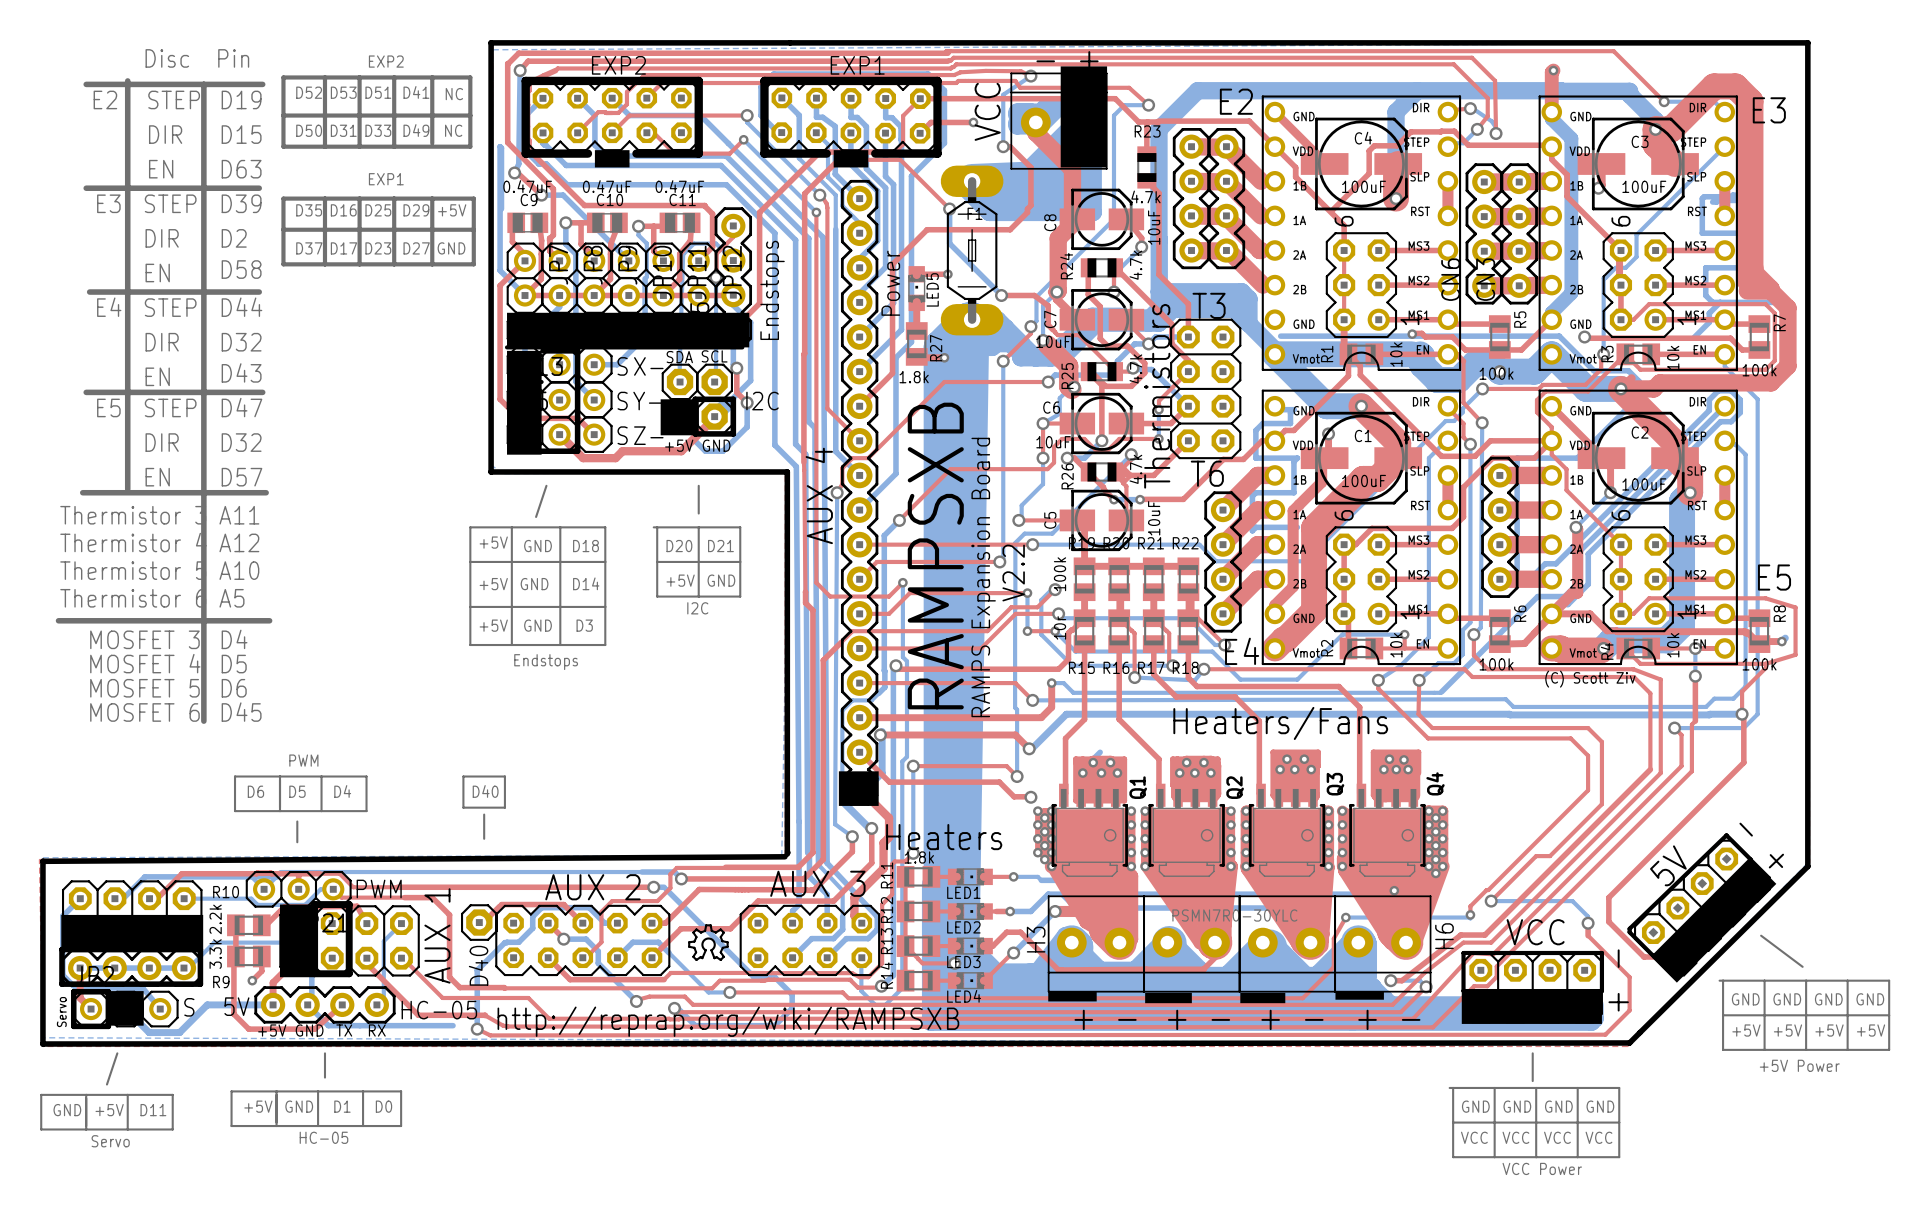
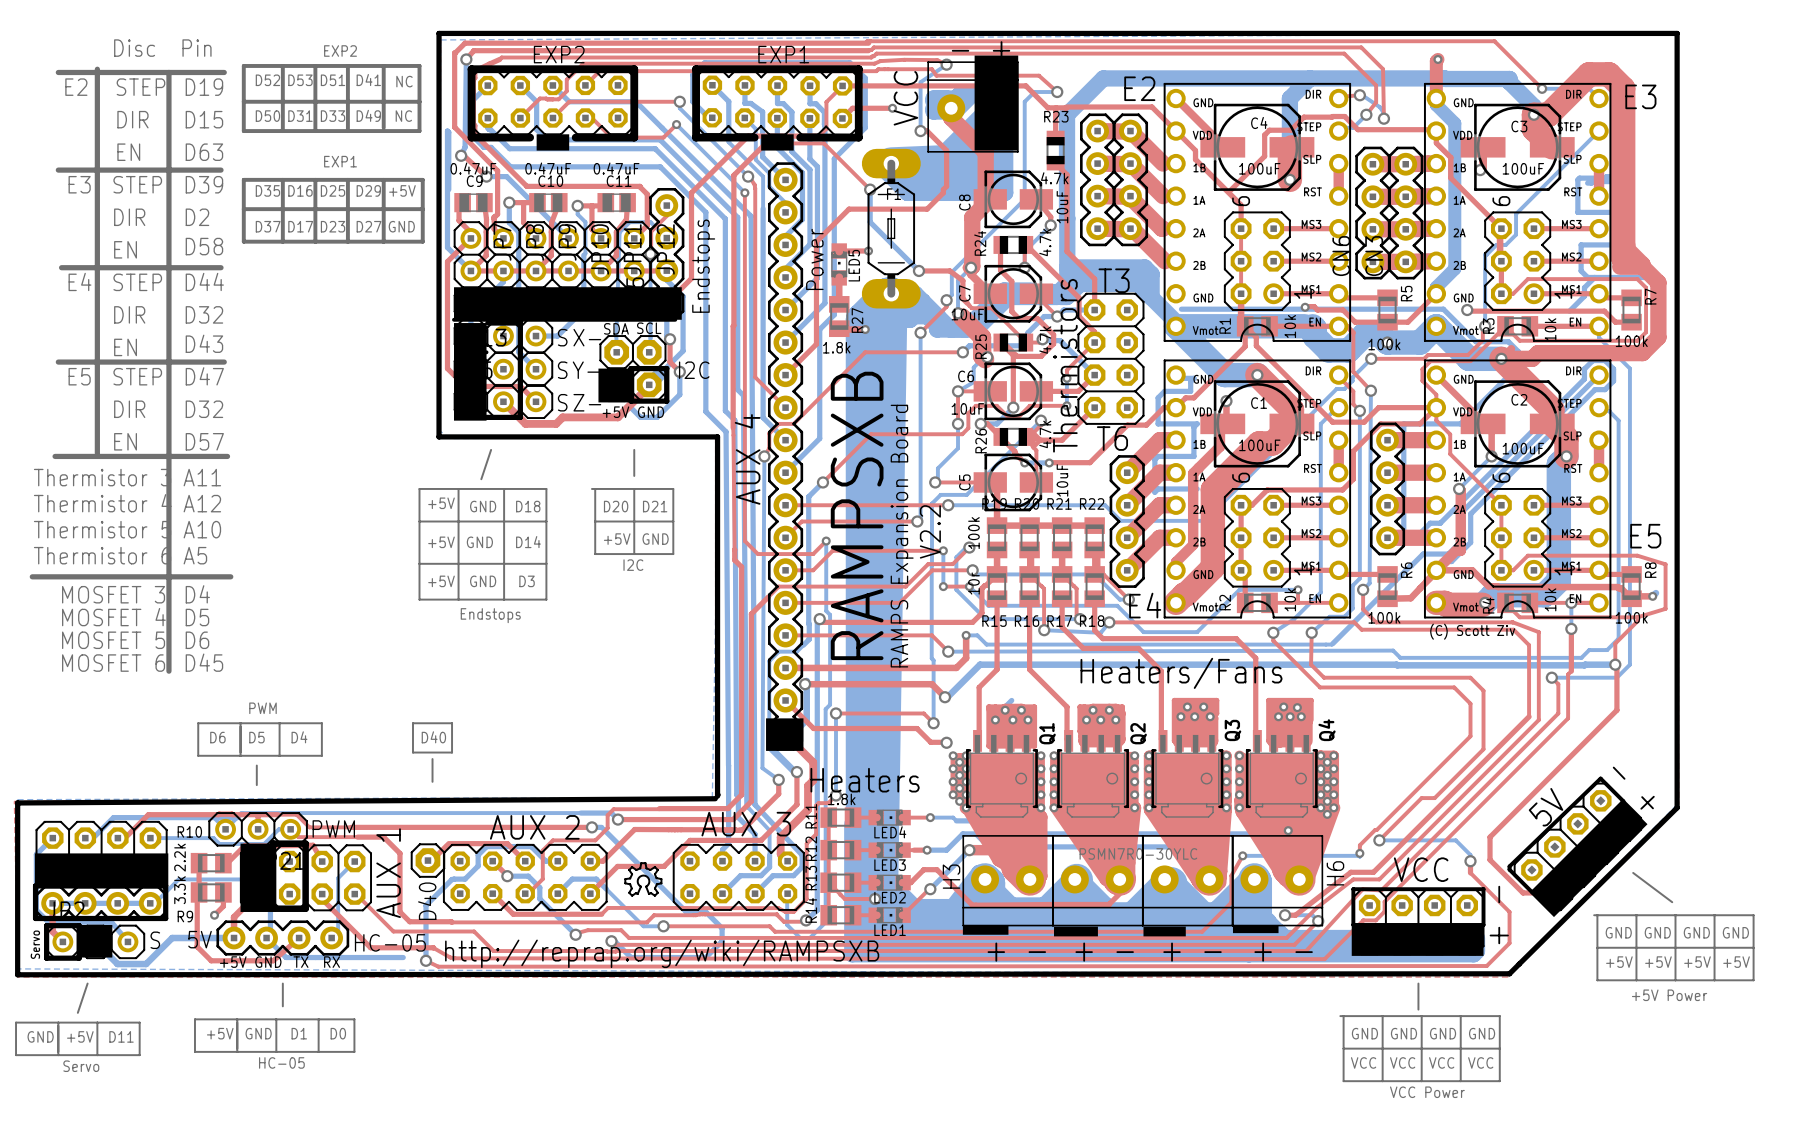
text: LED1 (963, 892) -> LED4 (890, 832)
text: LED2 (963, 927) -> LED3 (890, 865)
text: LED3 (963, 962) -> LED2 (890, 897)
text: LED4 (964, 996) -> LED1 (890, 930)

